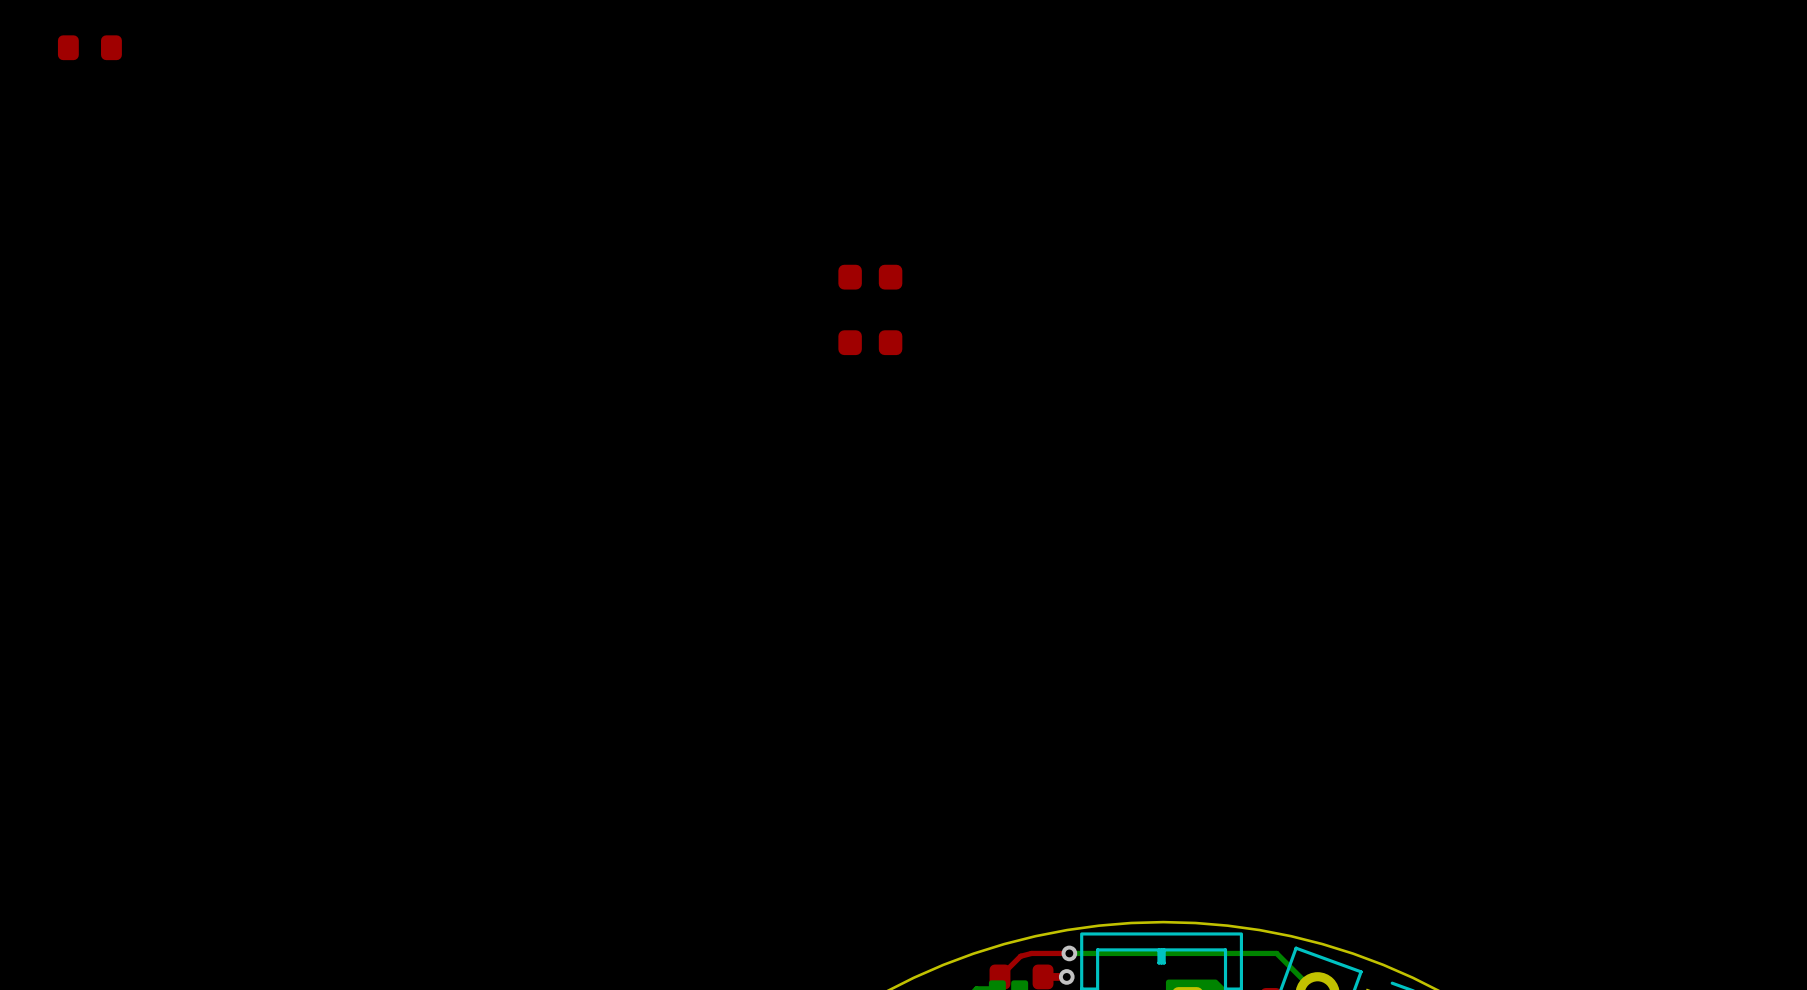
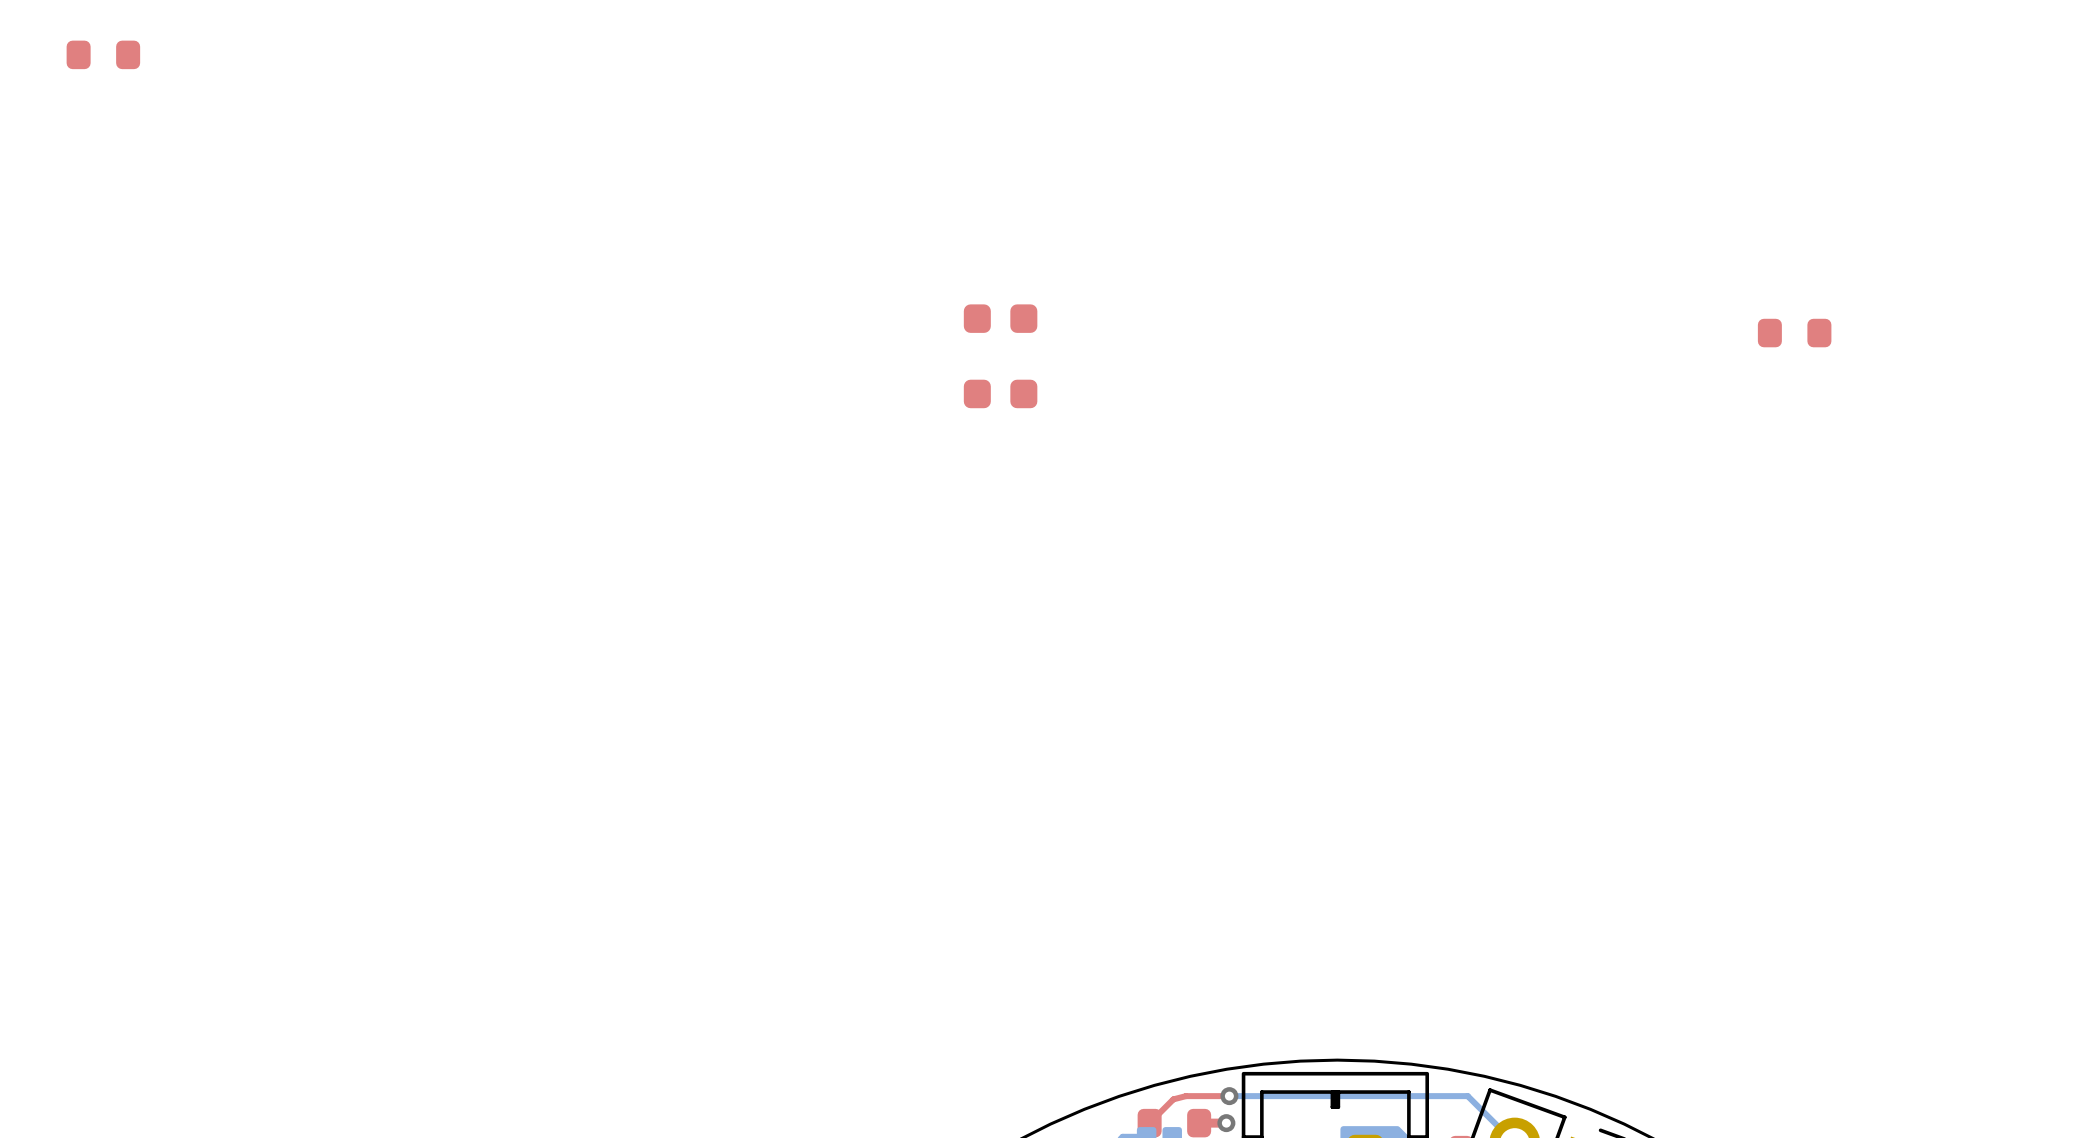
part: none -> (1794, 333)

